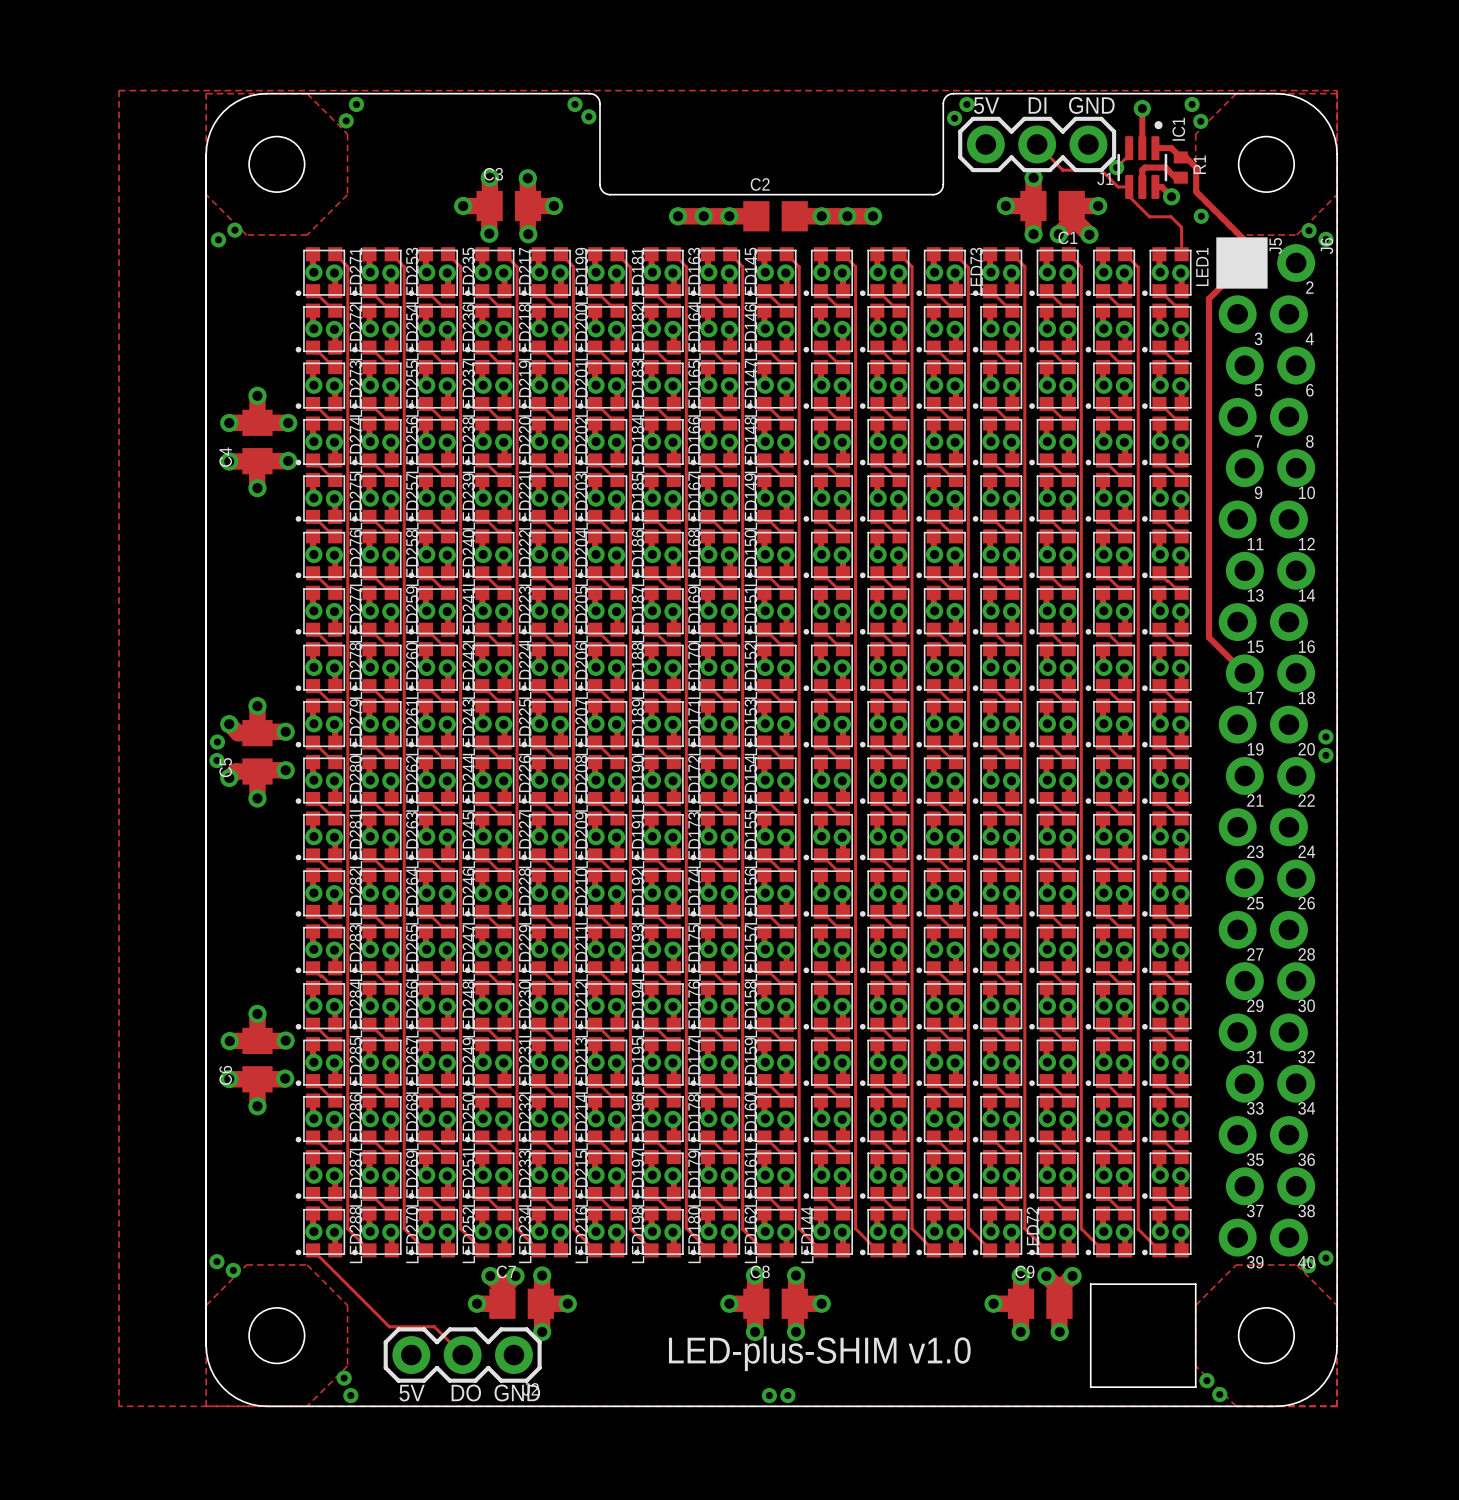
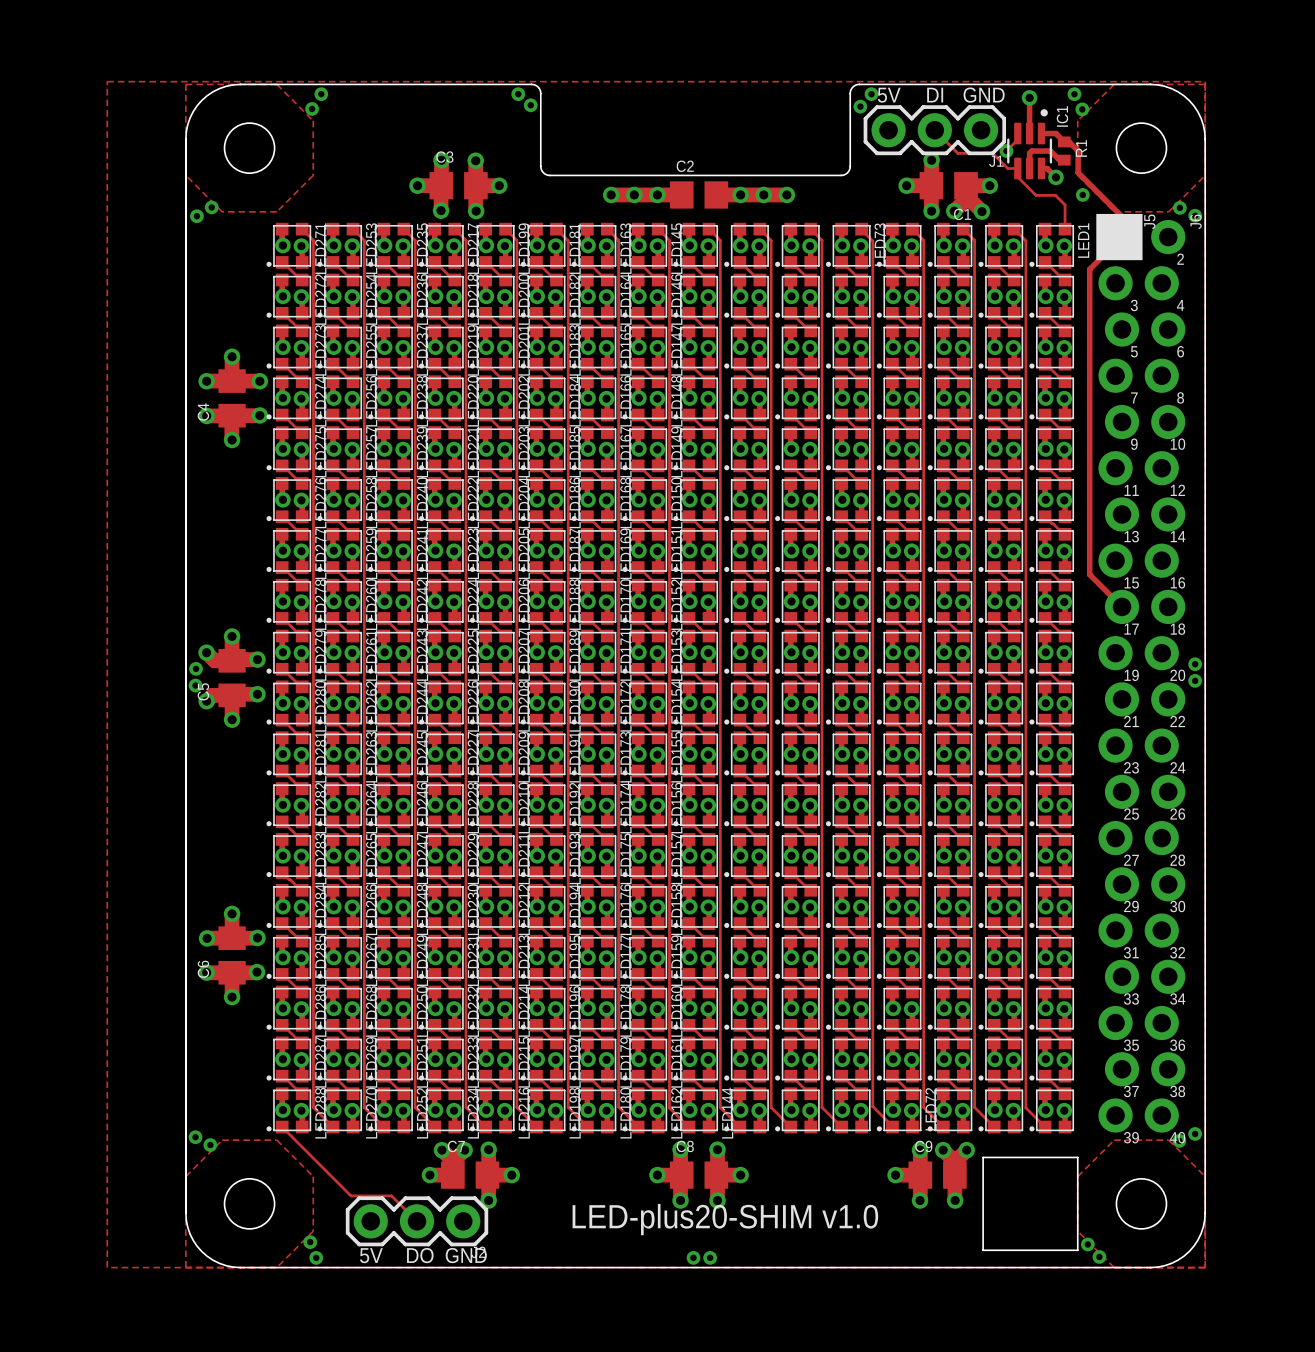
text: LED-plus-SHIM v1.0 (819, 1353) -> LED-plus20-SHIM v1.0 (725, 1219)

